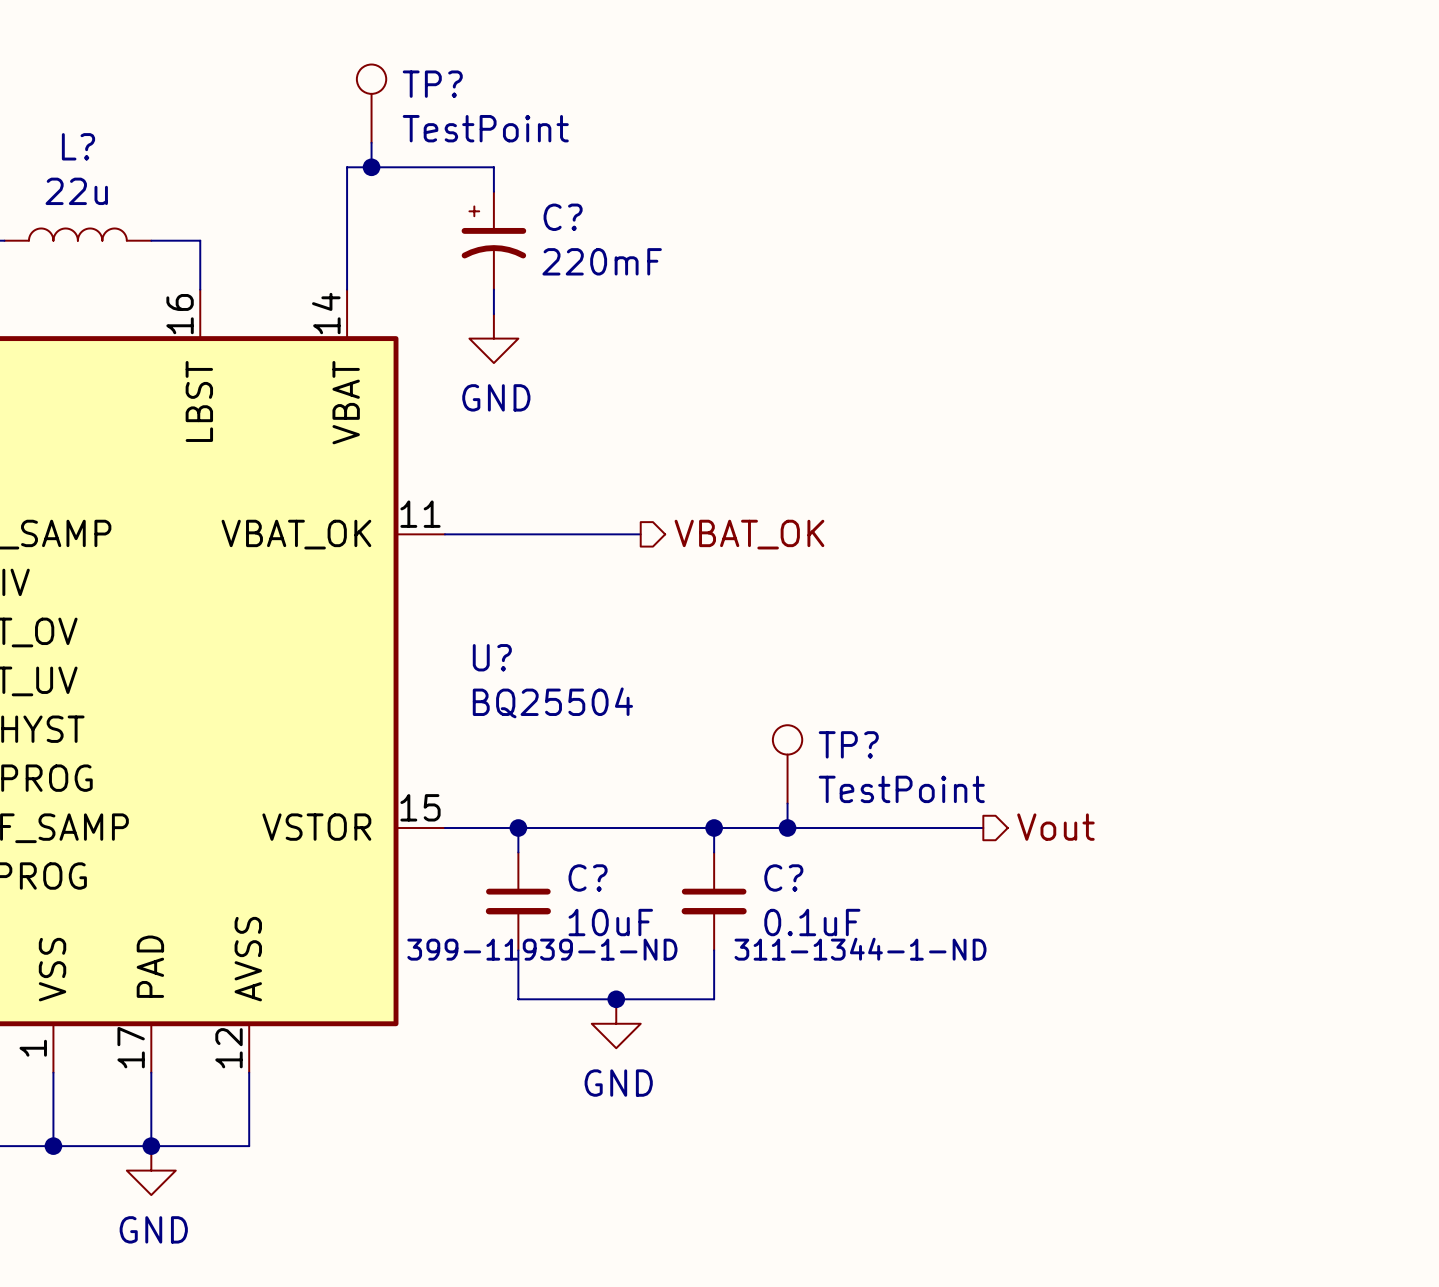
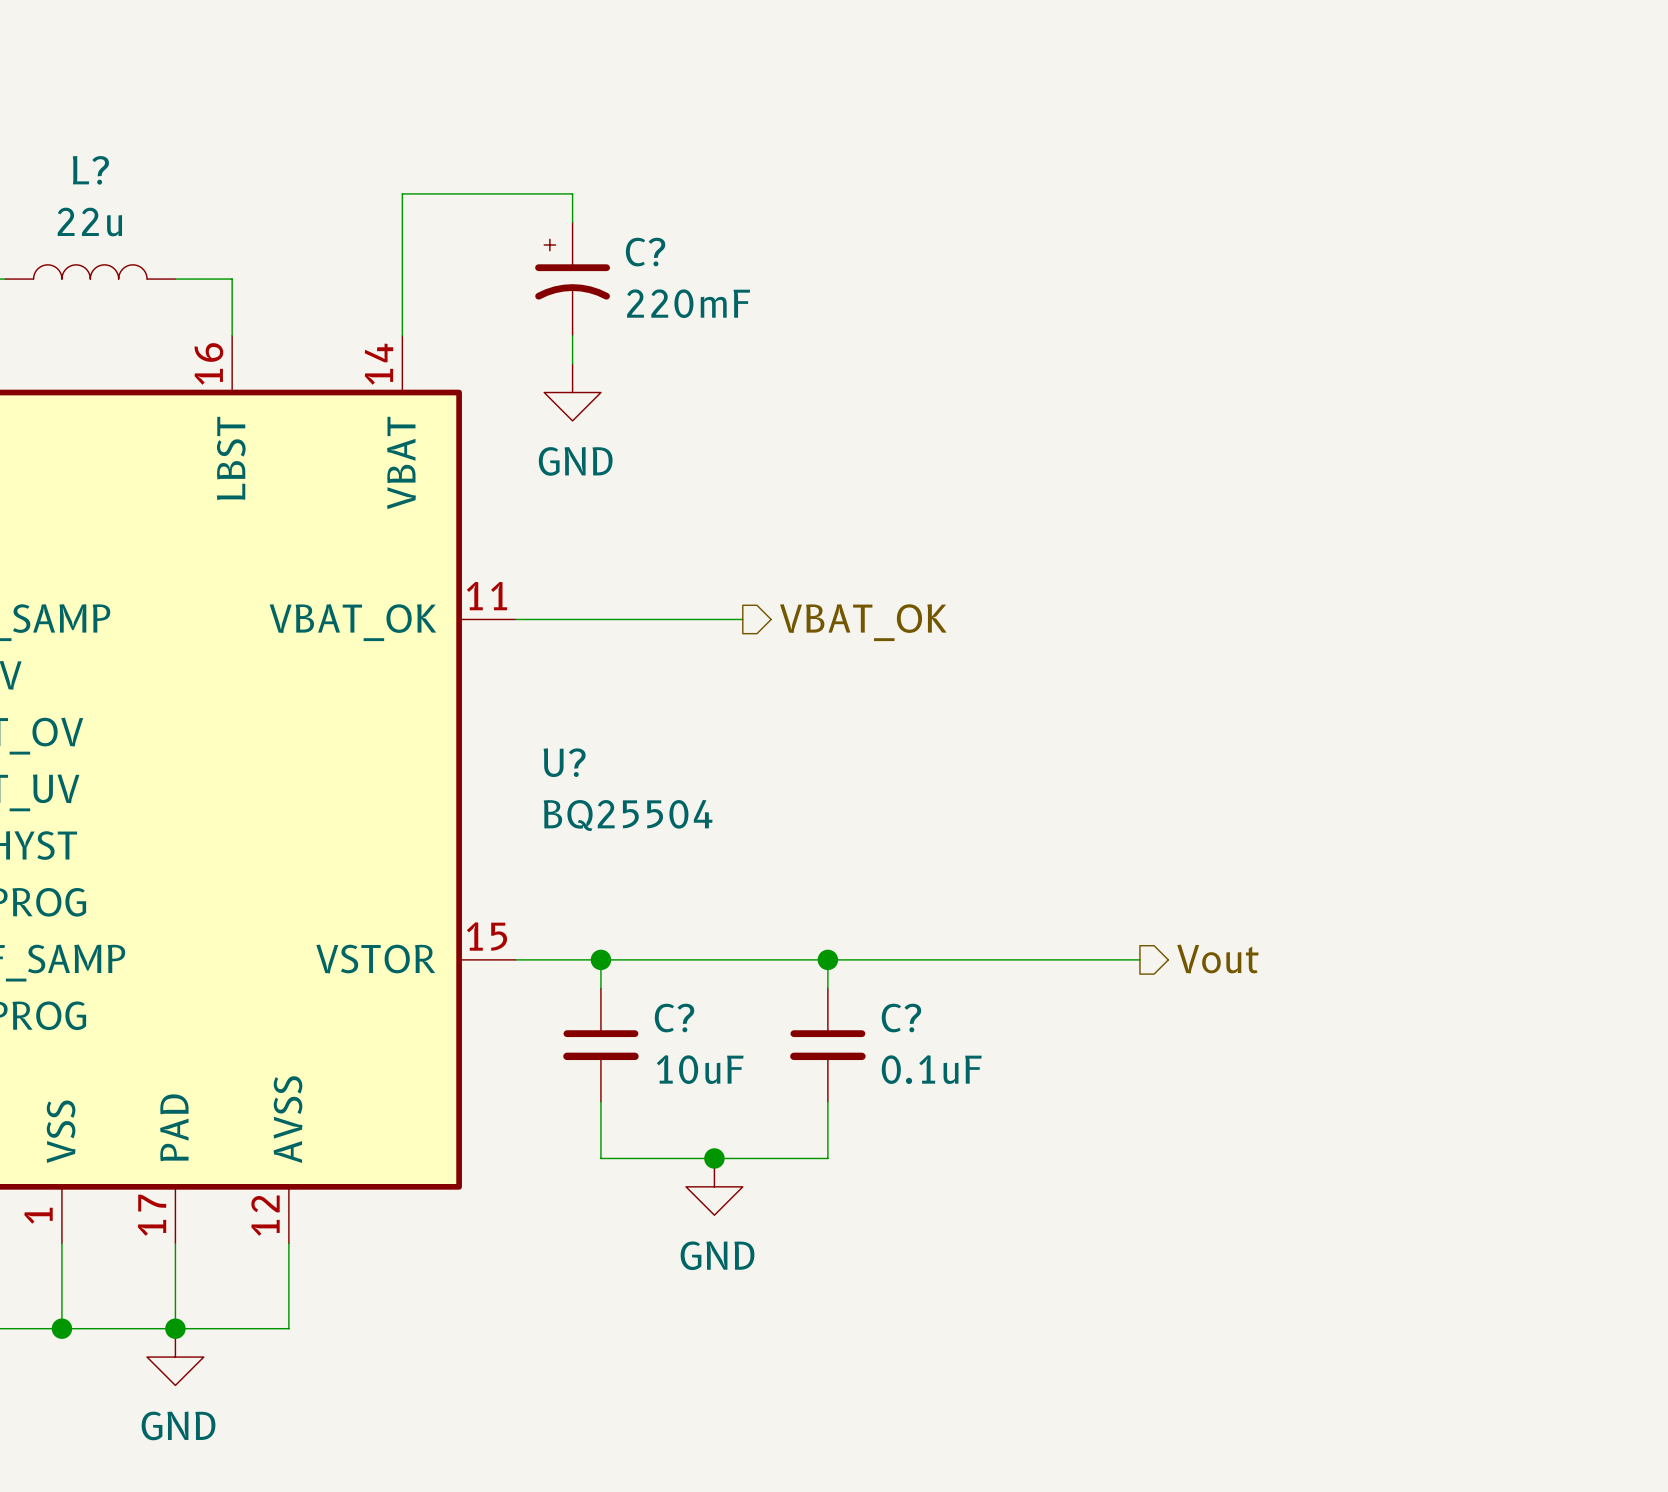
TP?: TestPoint (371, 103) -> none
wire: (371, 142) (371, 167) -> none
junction: (371, 167) -> none
TP?: TestPoint (787, 764) -> none
wire: (787, 803) (787, 828) -> none
junction: (787, 828) -> none
C? text: 399-11939-1-ND (542, 949) -> none
C? text: 311-1344-1-ND (860, 949) -> none

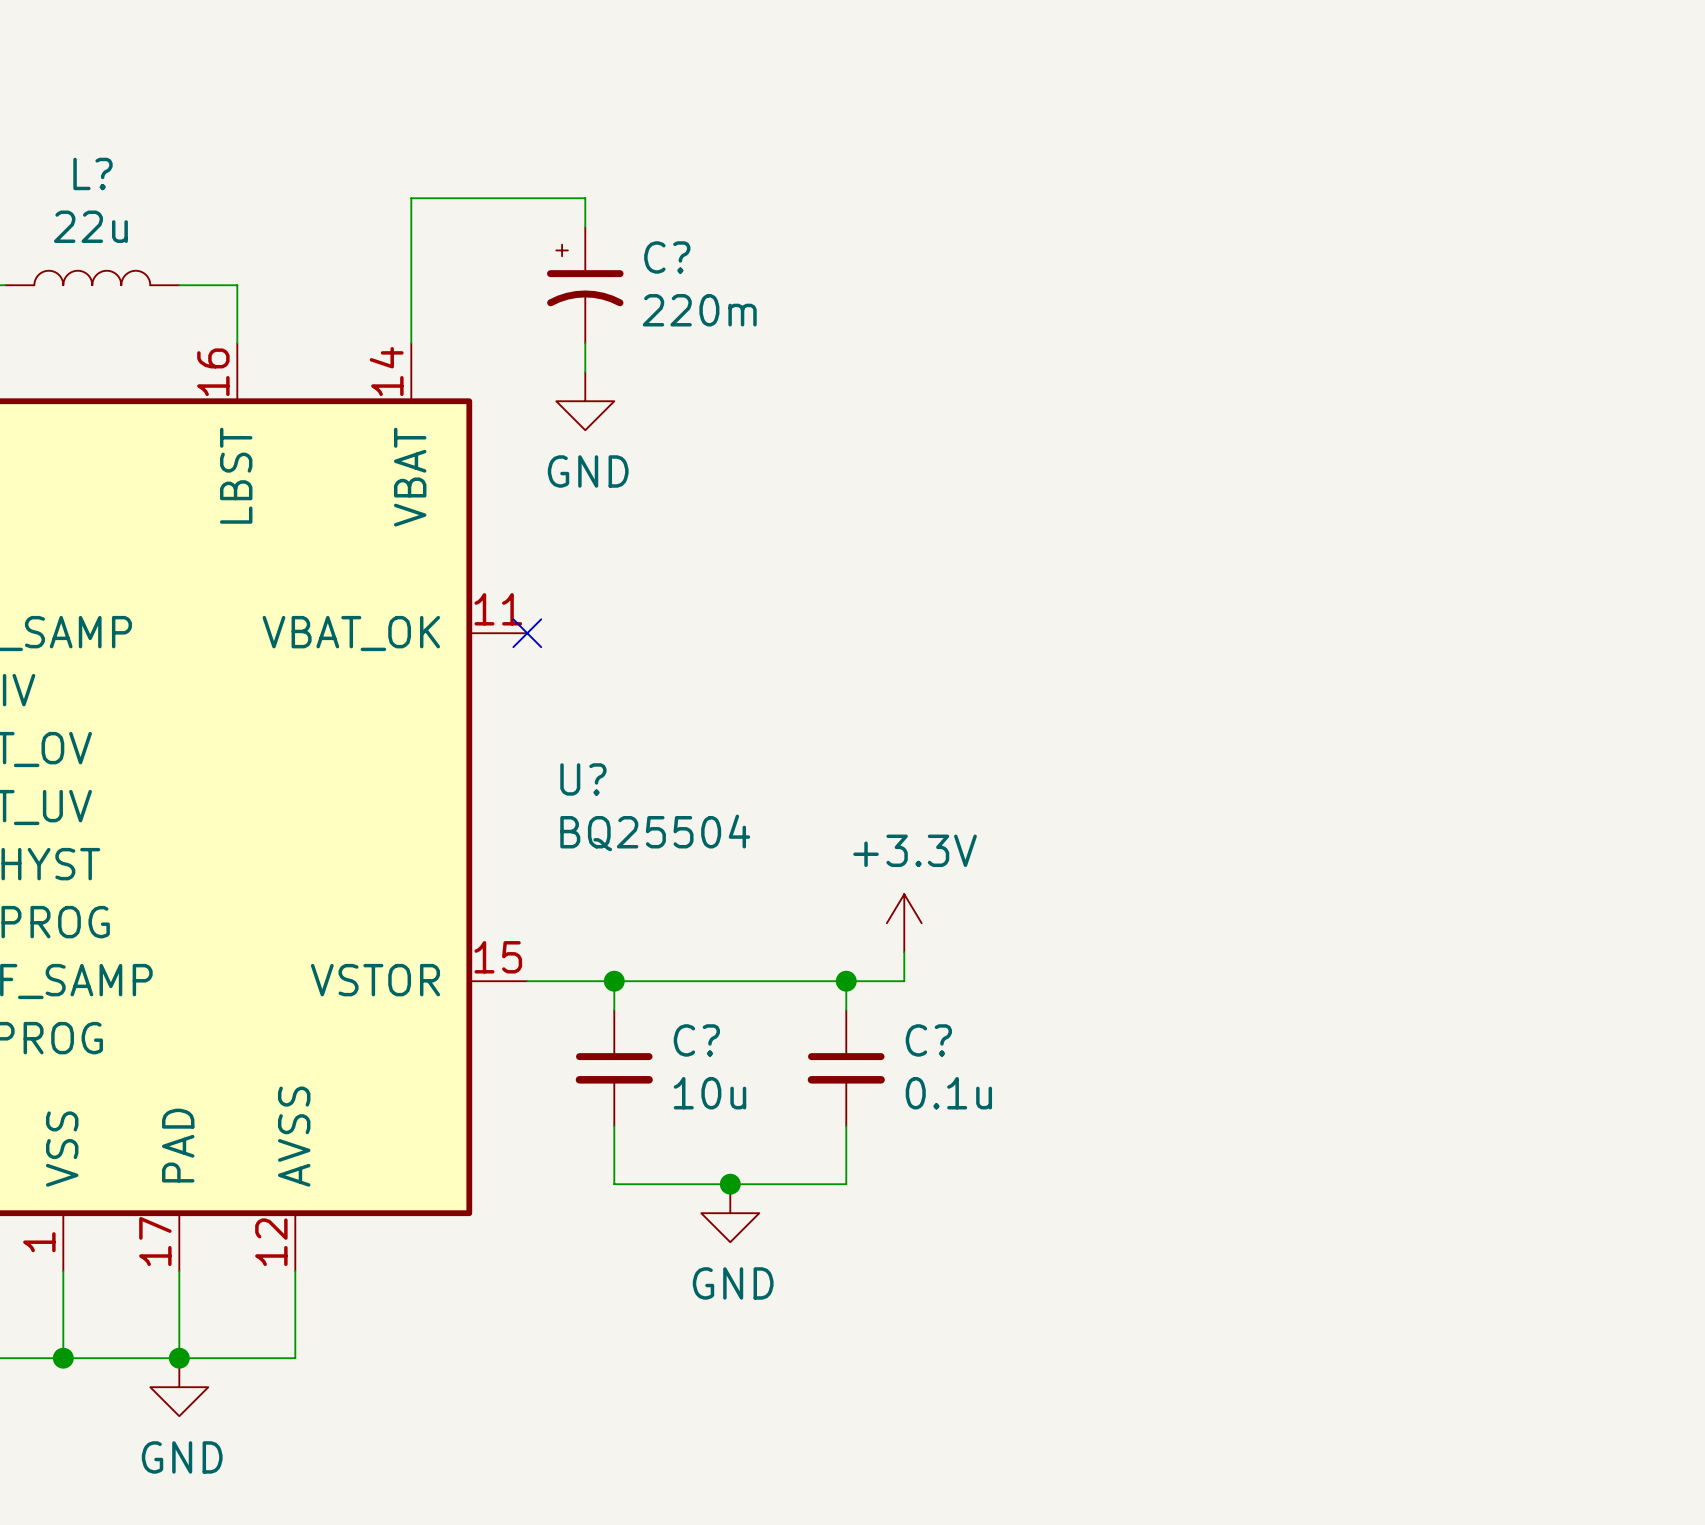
C? value: 220mF (688, 303) -> 220m (699, 310)
wire: (515, 619) (742, 619) -> none
no-connect mark: none -> (527, 633)
hierarchical label: VBAT_OK (863, 622) -> none
power symbol: none -> +3.3V (904, 923)
wire: (884, 959) (1139, 959) -> (904, 981) (904, 952)
hierarchical label: Vout (1217, 959) -> none
C? value: 10uF (700, 1069) -> 10u (709, 1093)
C? value: 0.1uF (931, 1069) -> 0.1u (948, 1093)

